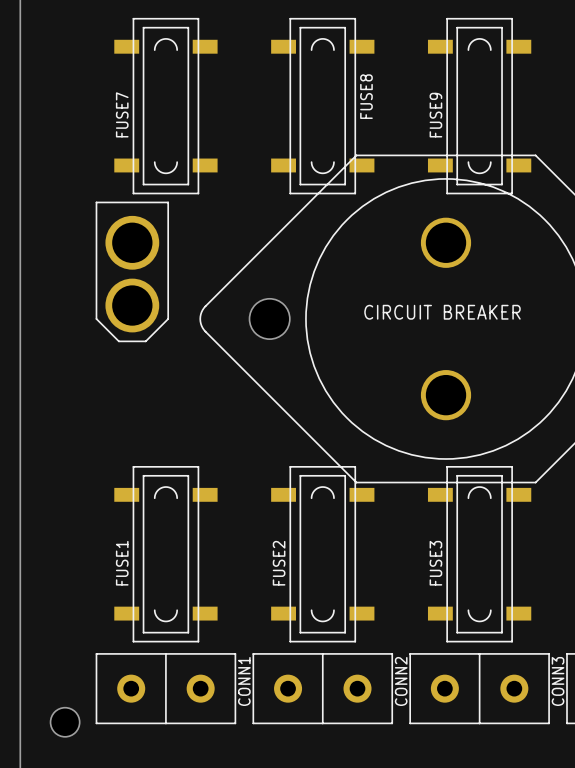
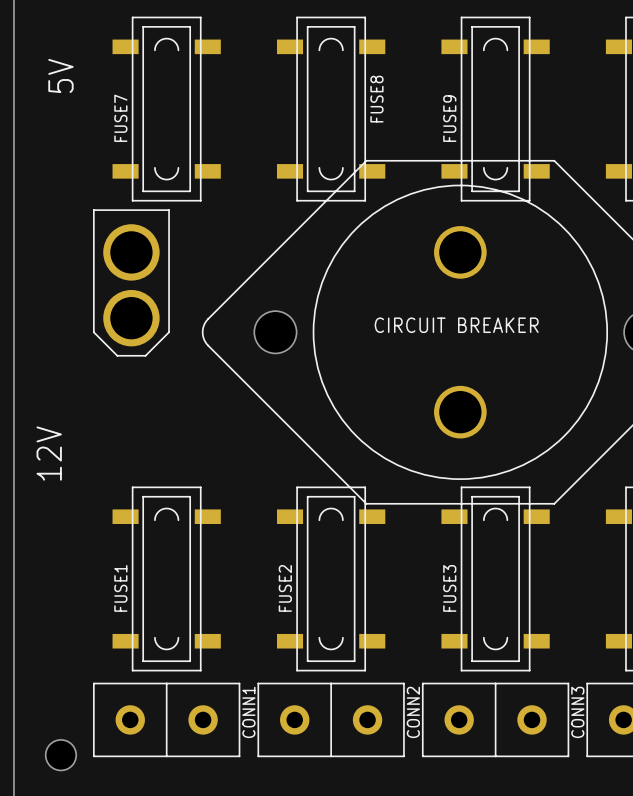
text: none -> 5V (60, 75)
text: none -> 12V (49, 453)

